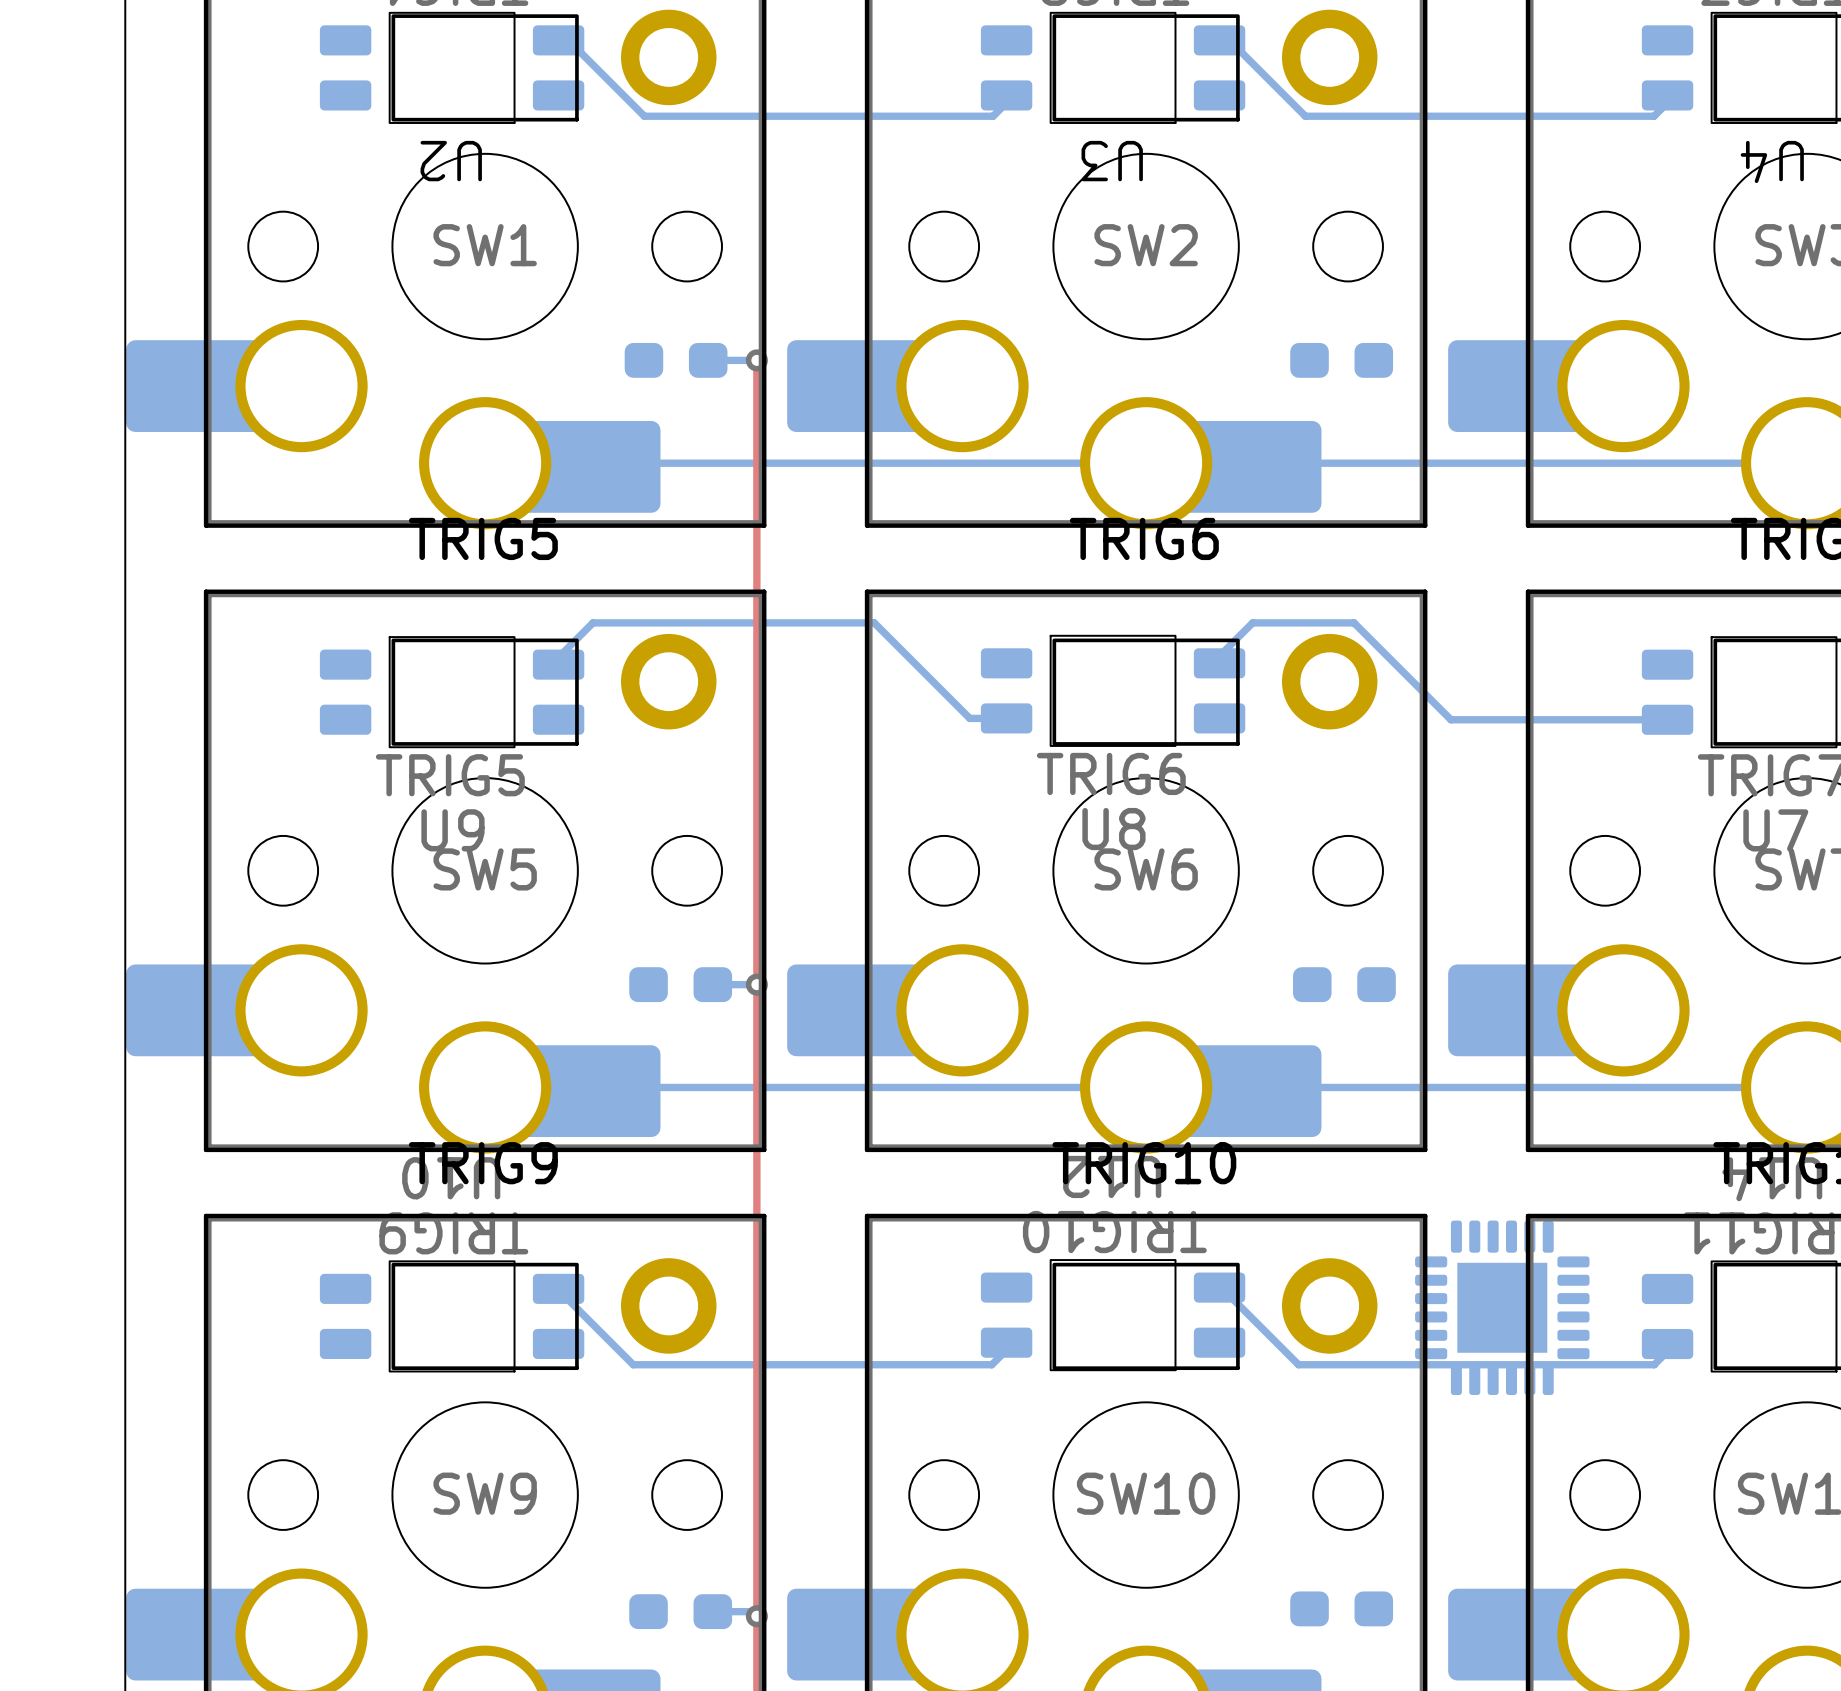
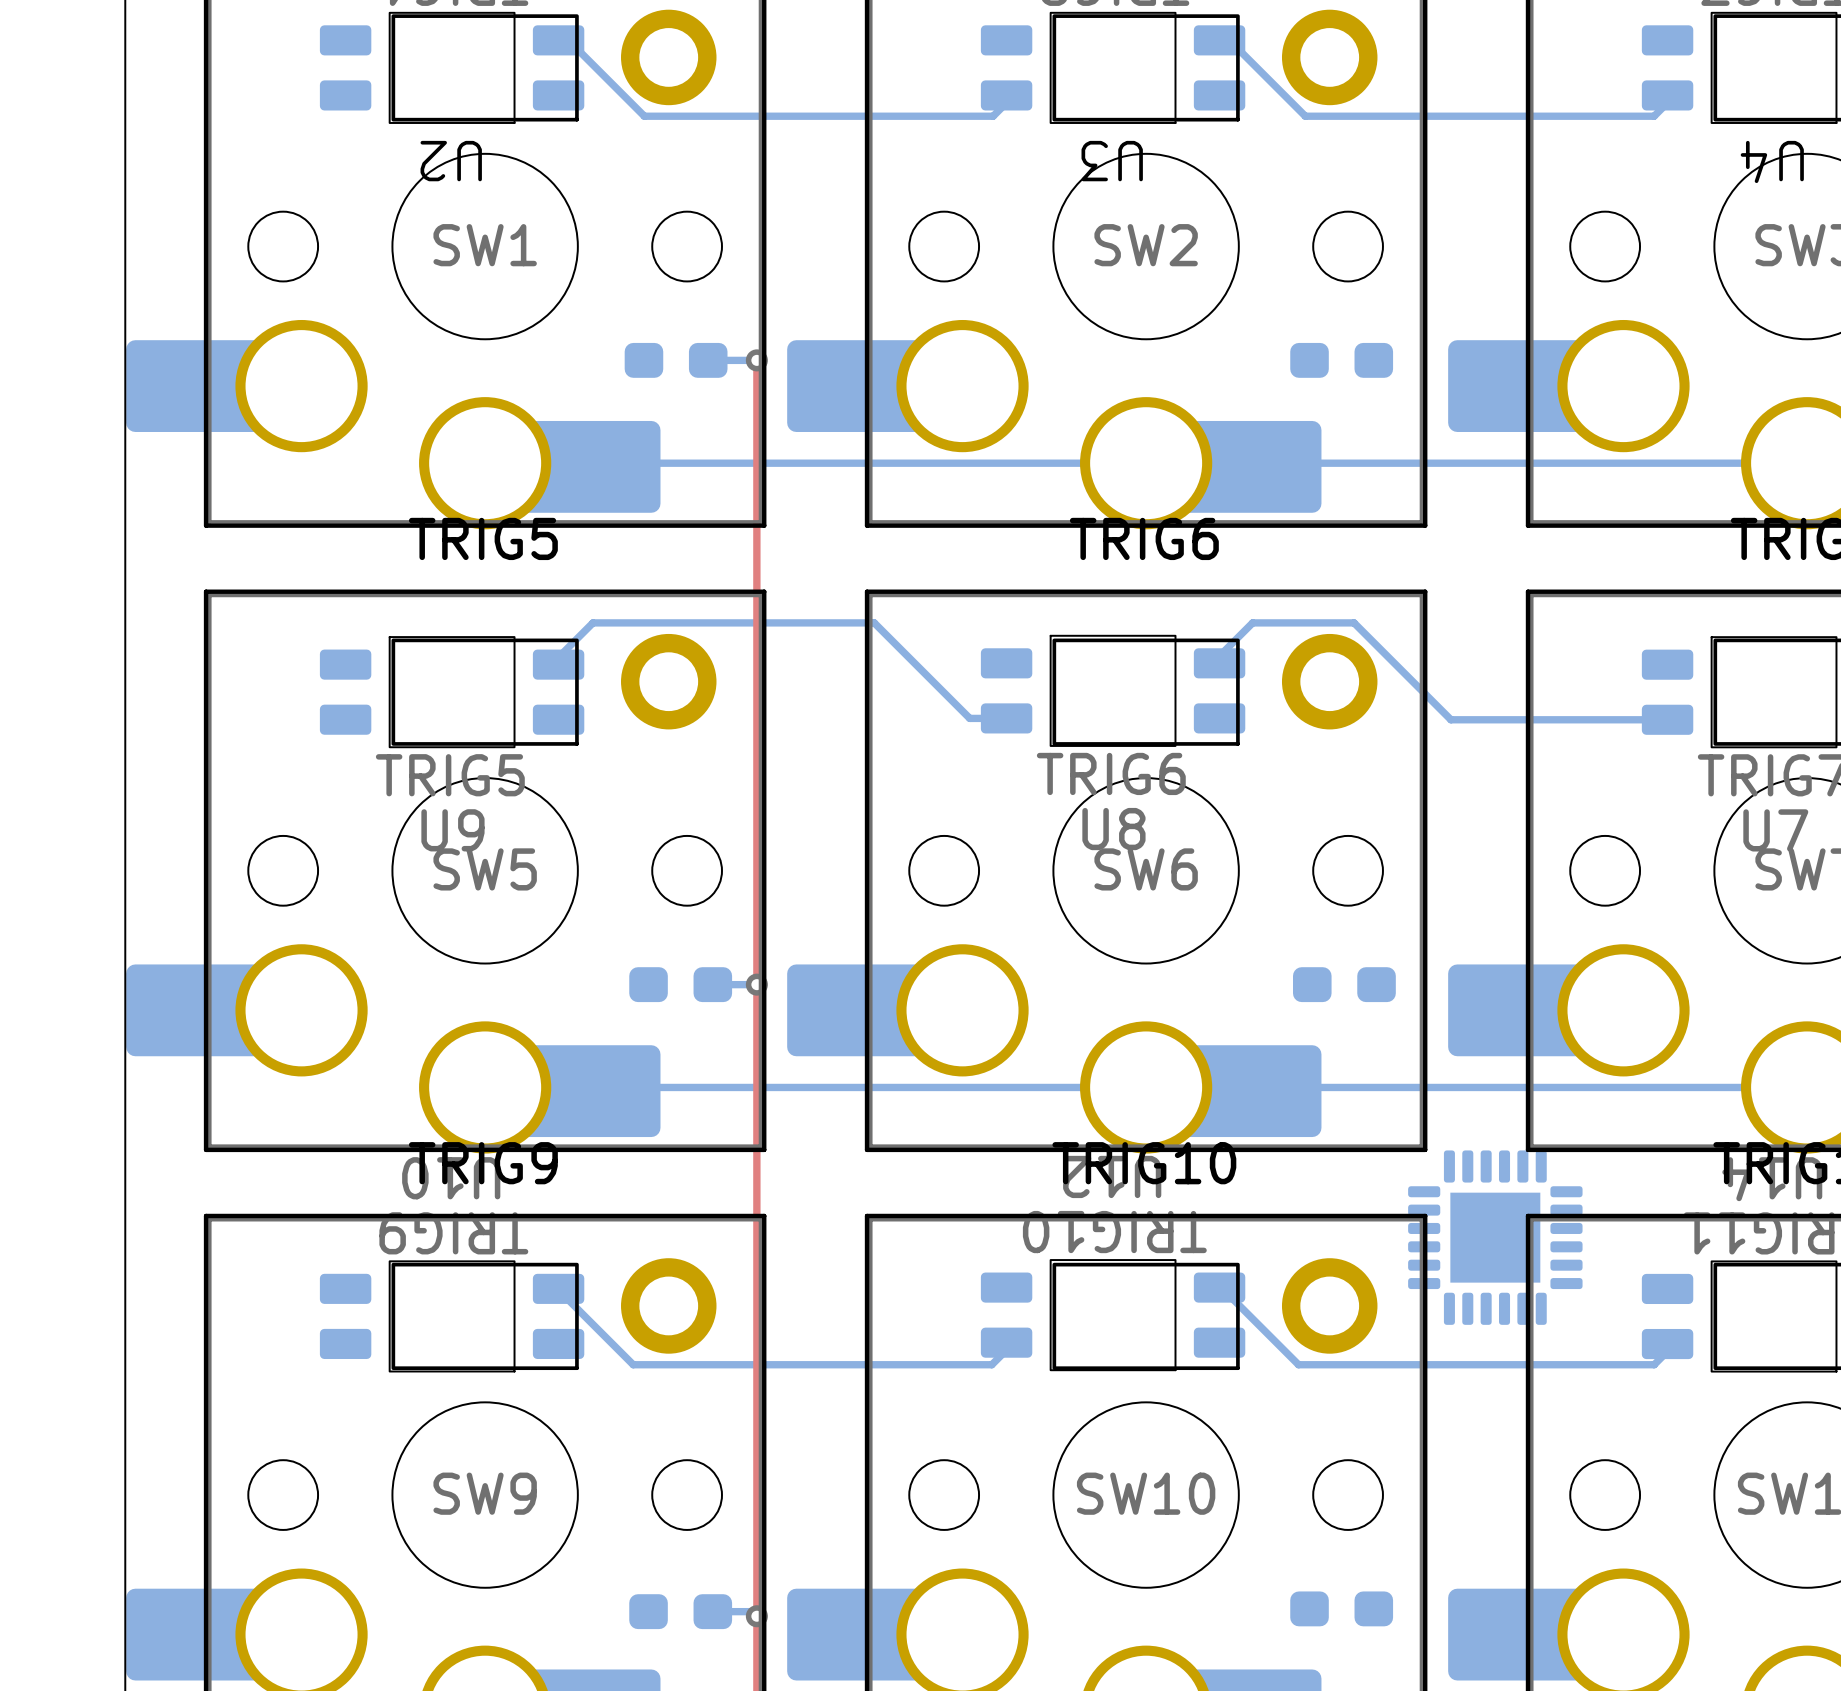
part position: (1502, 1307) -> (1495, 1237)

